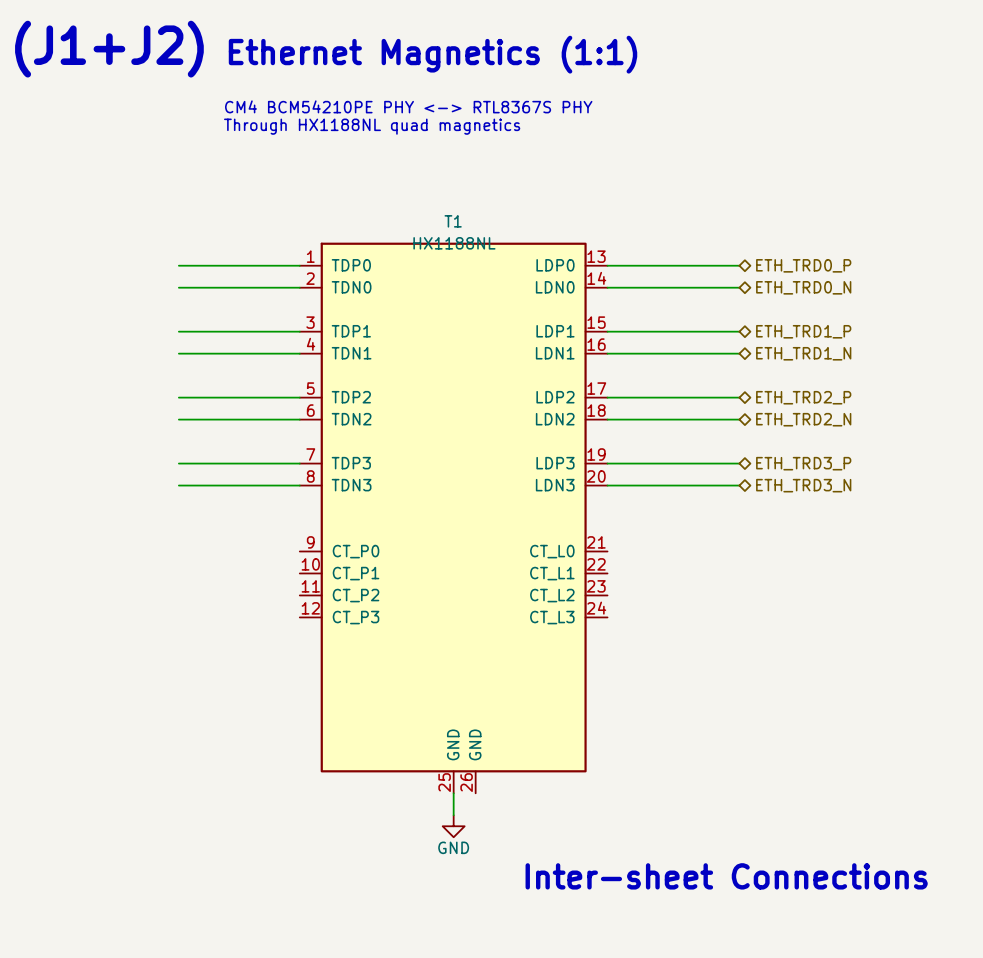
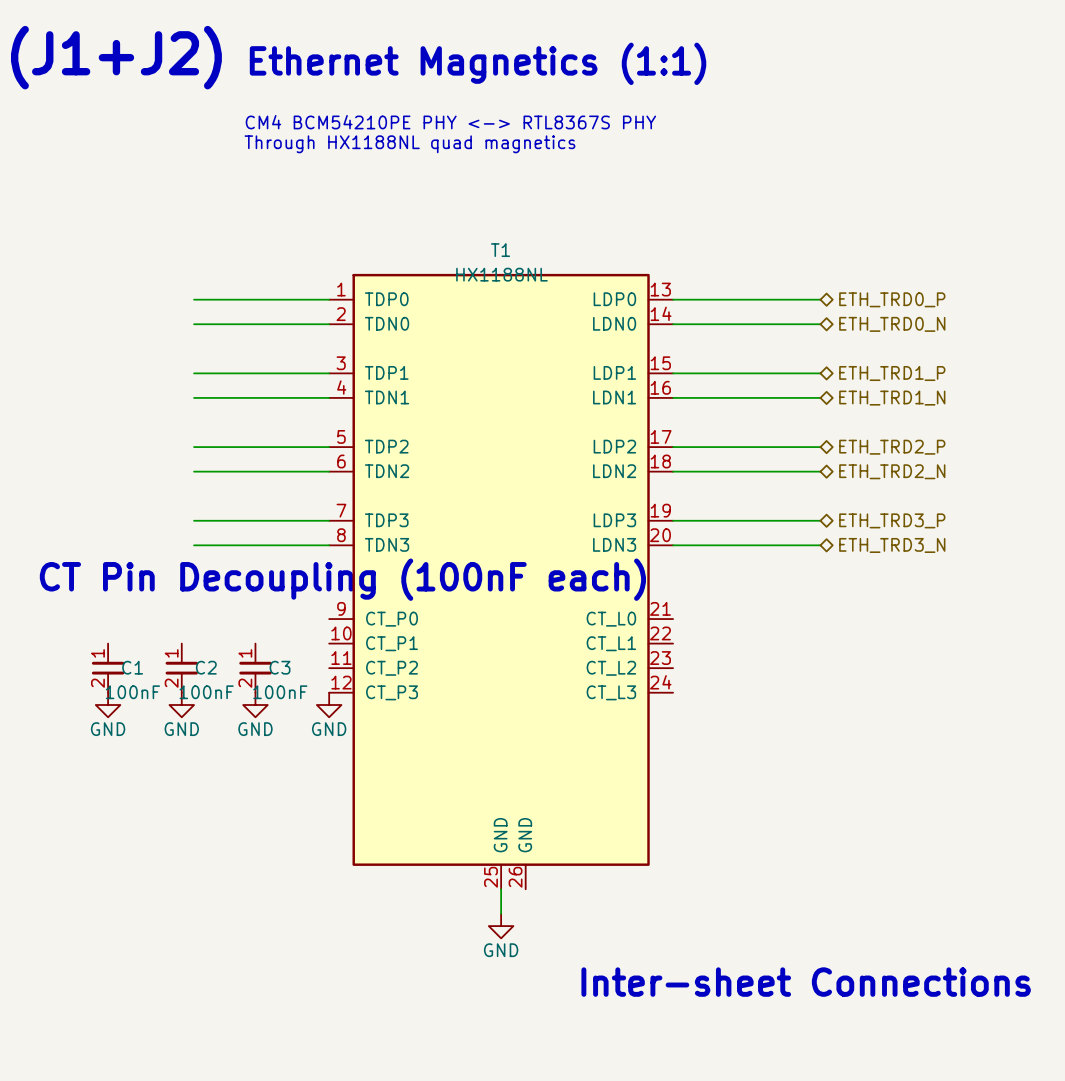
text: none -> CT Pin Decoupling (100nF each) (342, 579)
C1: none -> 100nF (108, 668)
C2: none -> 100nF (181, 668)
C3: none -> 100nF (255, 668)
power symbol: none -> GND (108, 705)
power symbol: none -> GND (181, 705)
power symbol: none -> GND (255, 705)
power symbol: none -> GND (329, 705)

